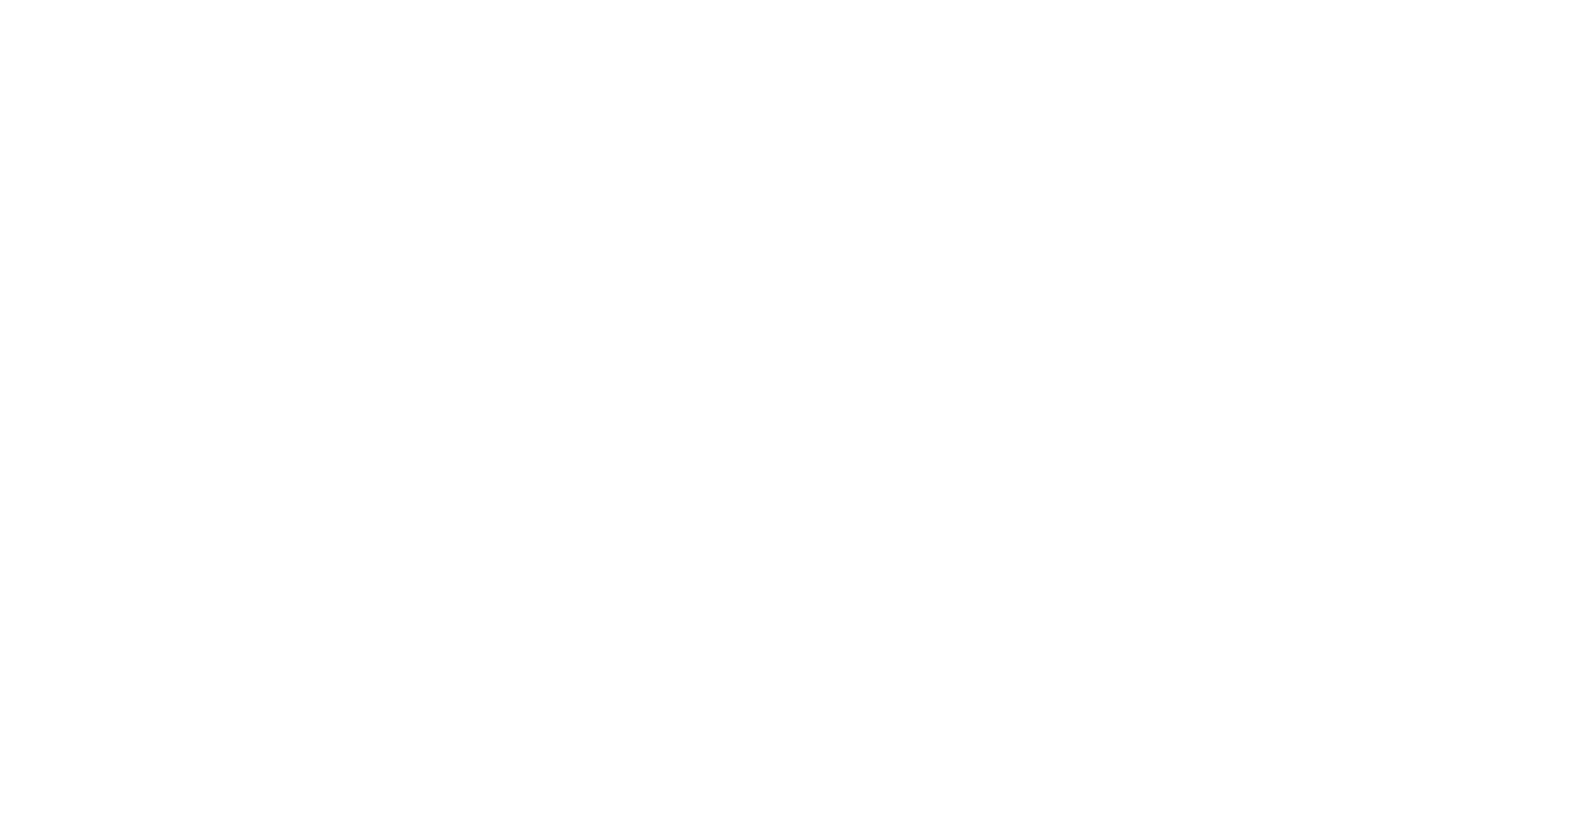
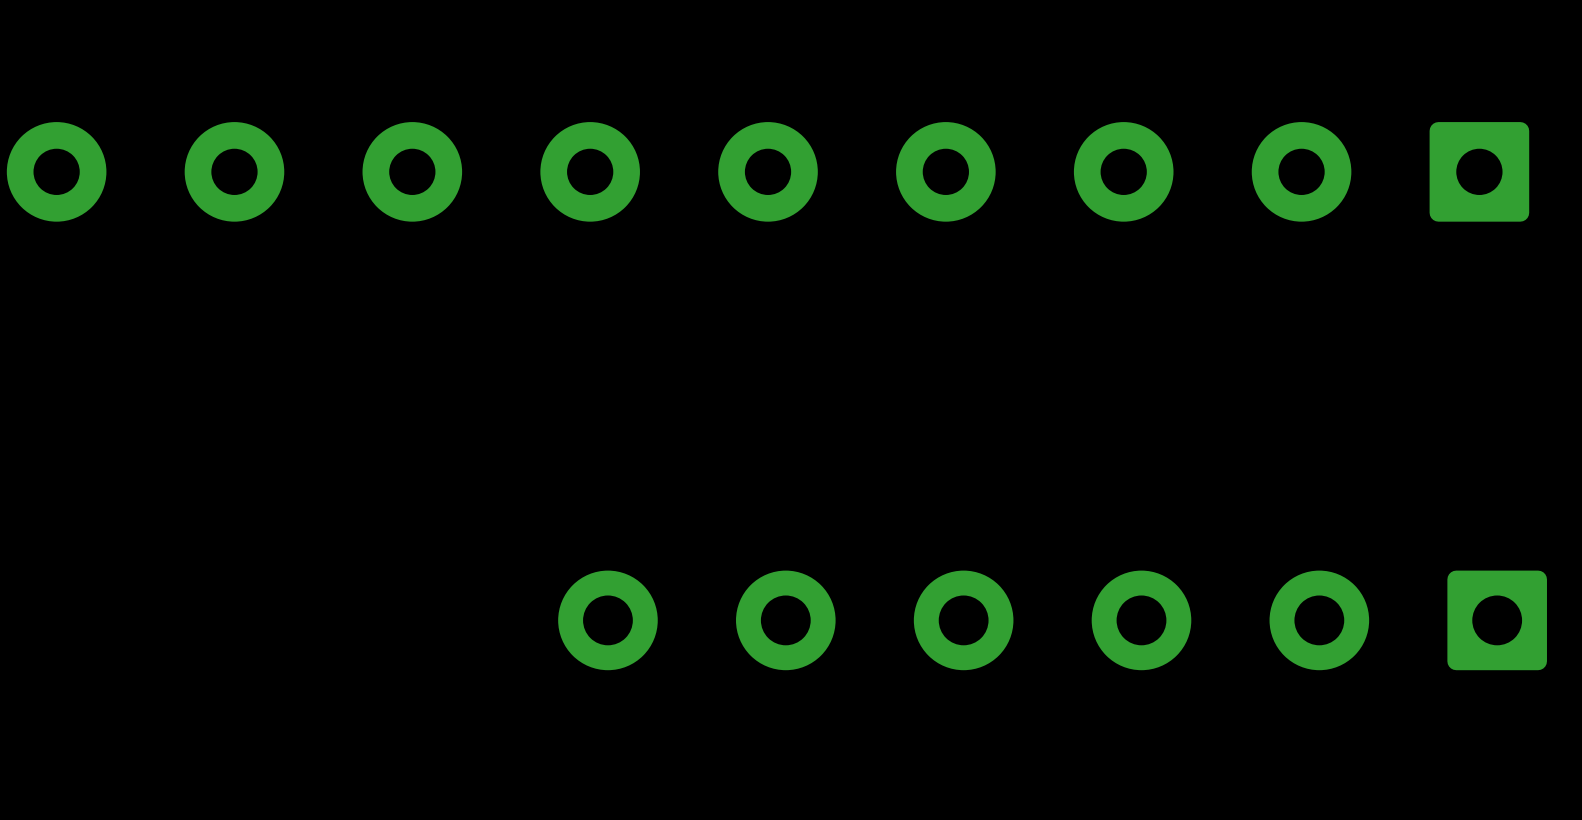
part: none -> (768, 171)
part: none -> (1052, 620)

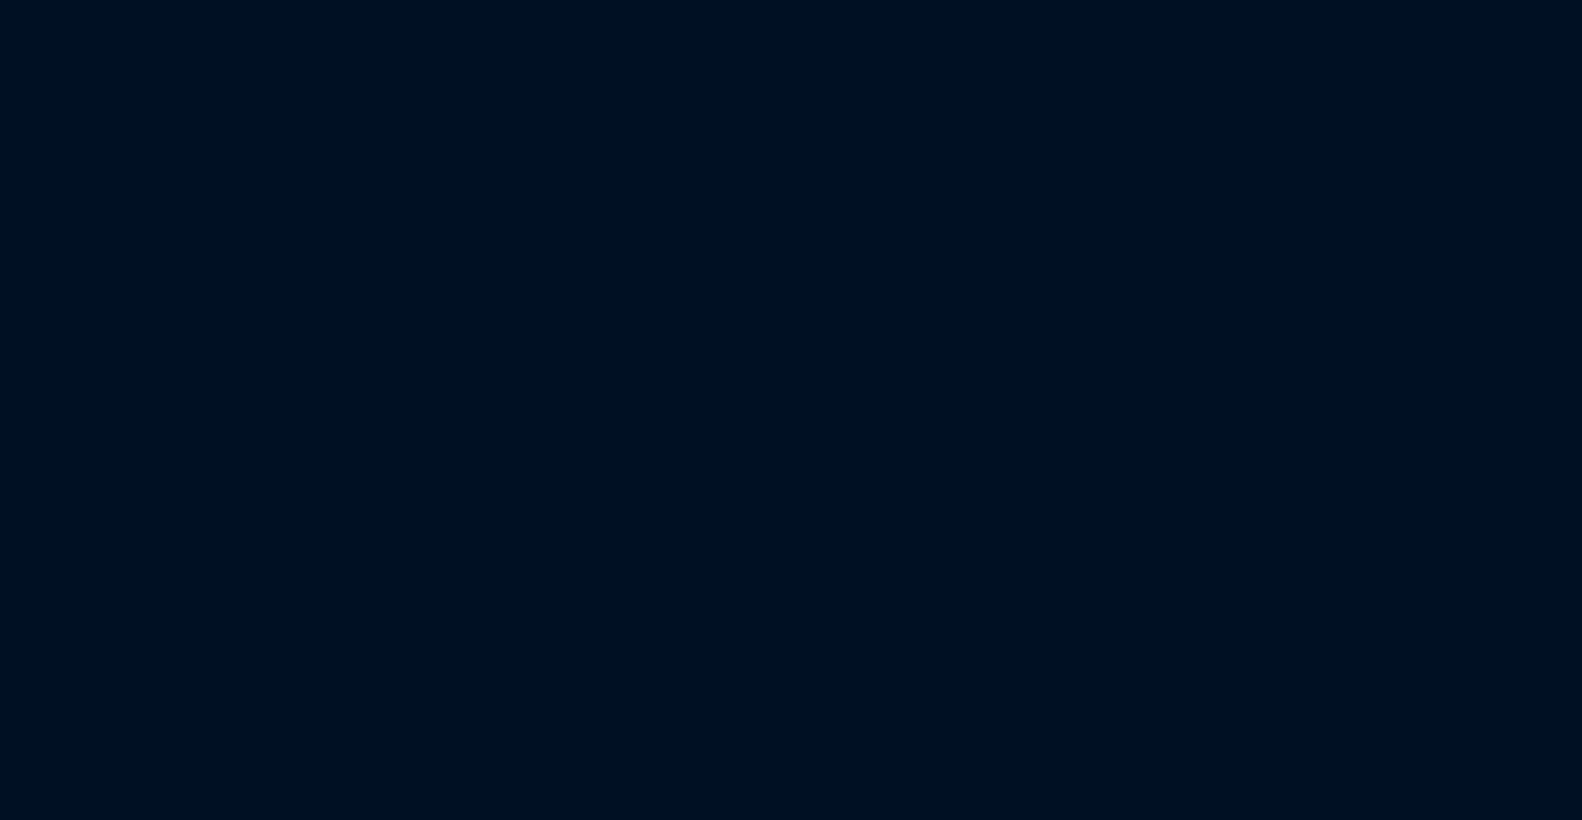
part: (768, 171) -> none
part: (1052, 620) -> none

